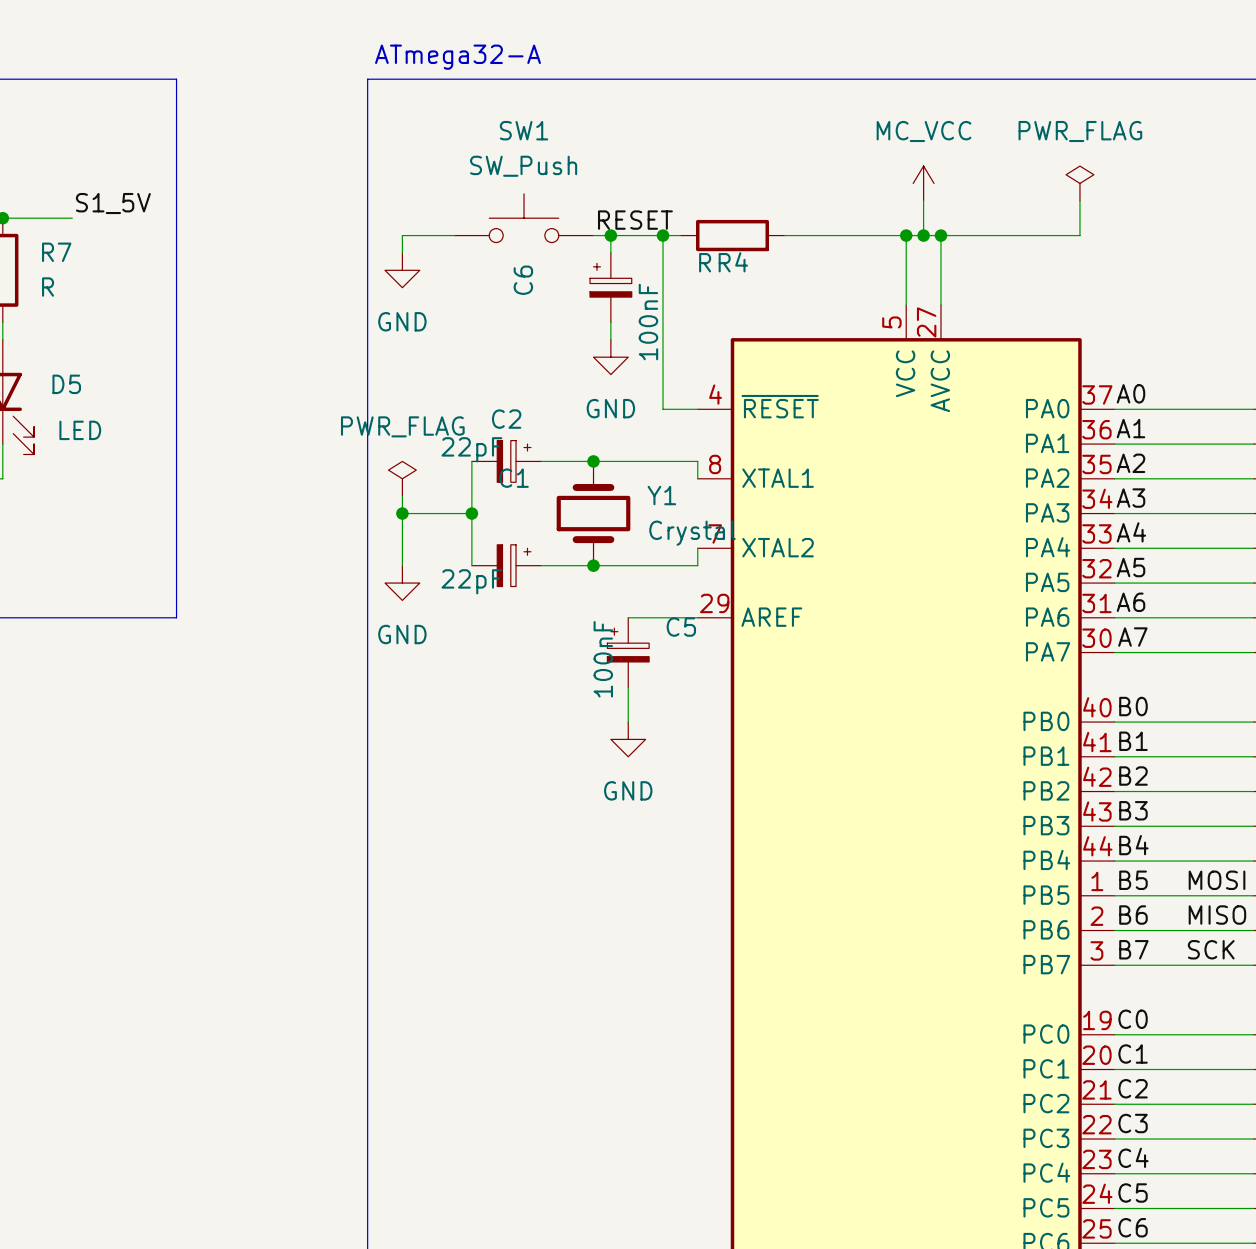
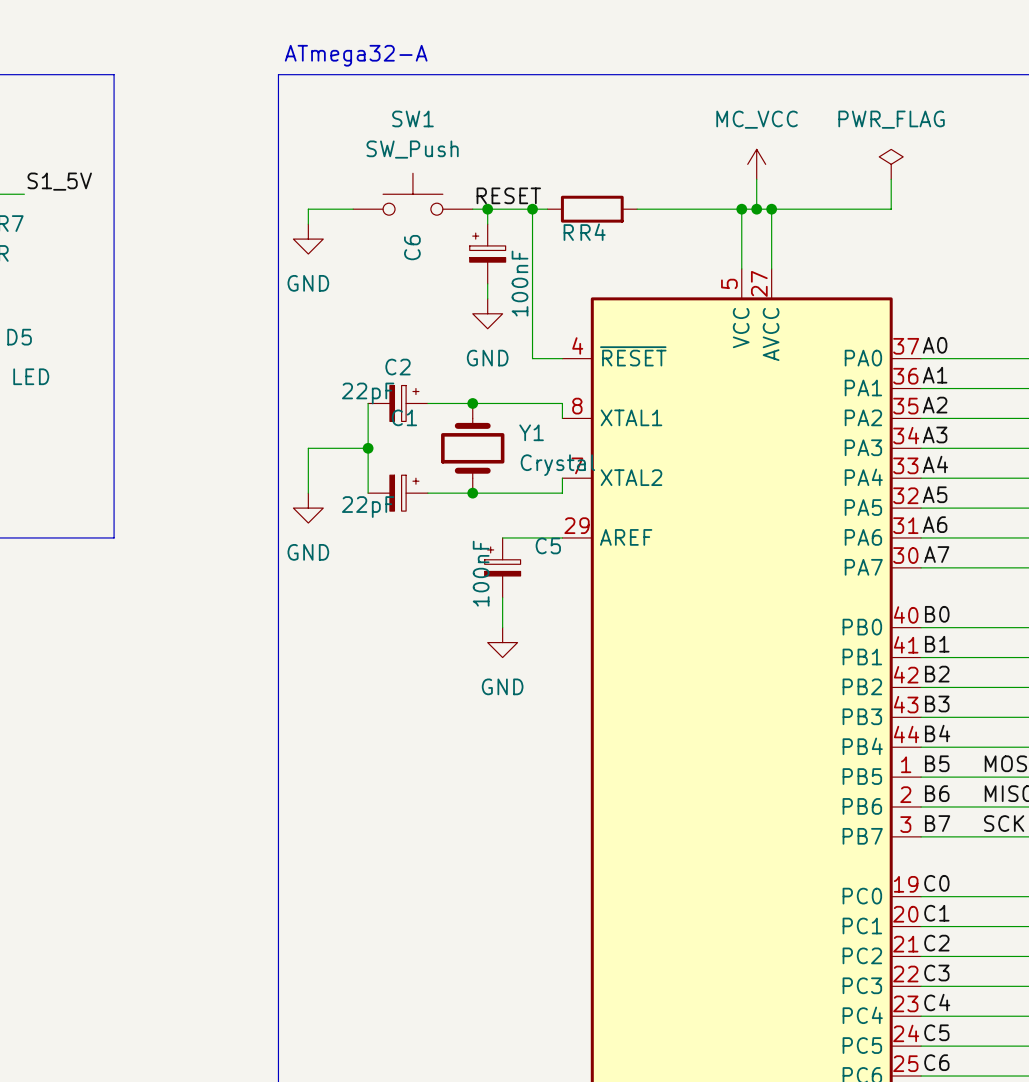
power symbol: PWR_FLAG (402, 478) -> none
wire: (402, 496) (402, 513) -> none
junction: (402, 513) -> none

